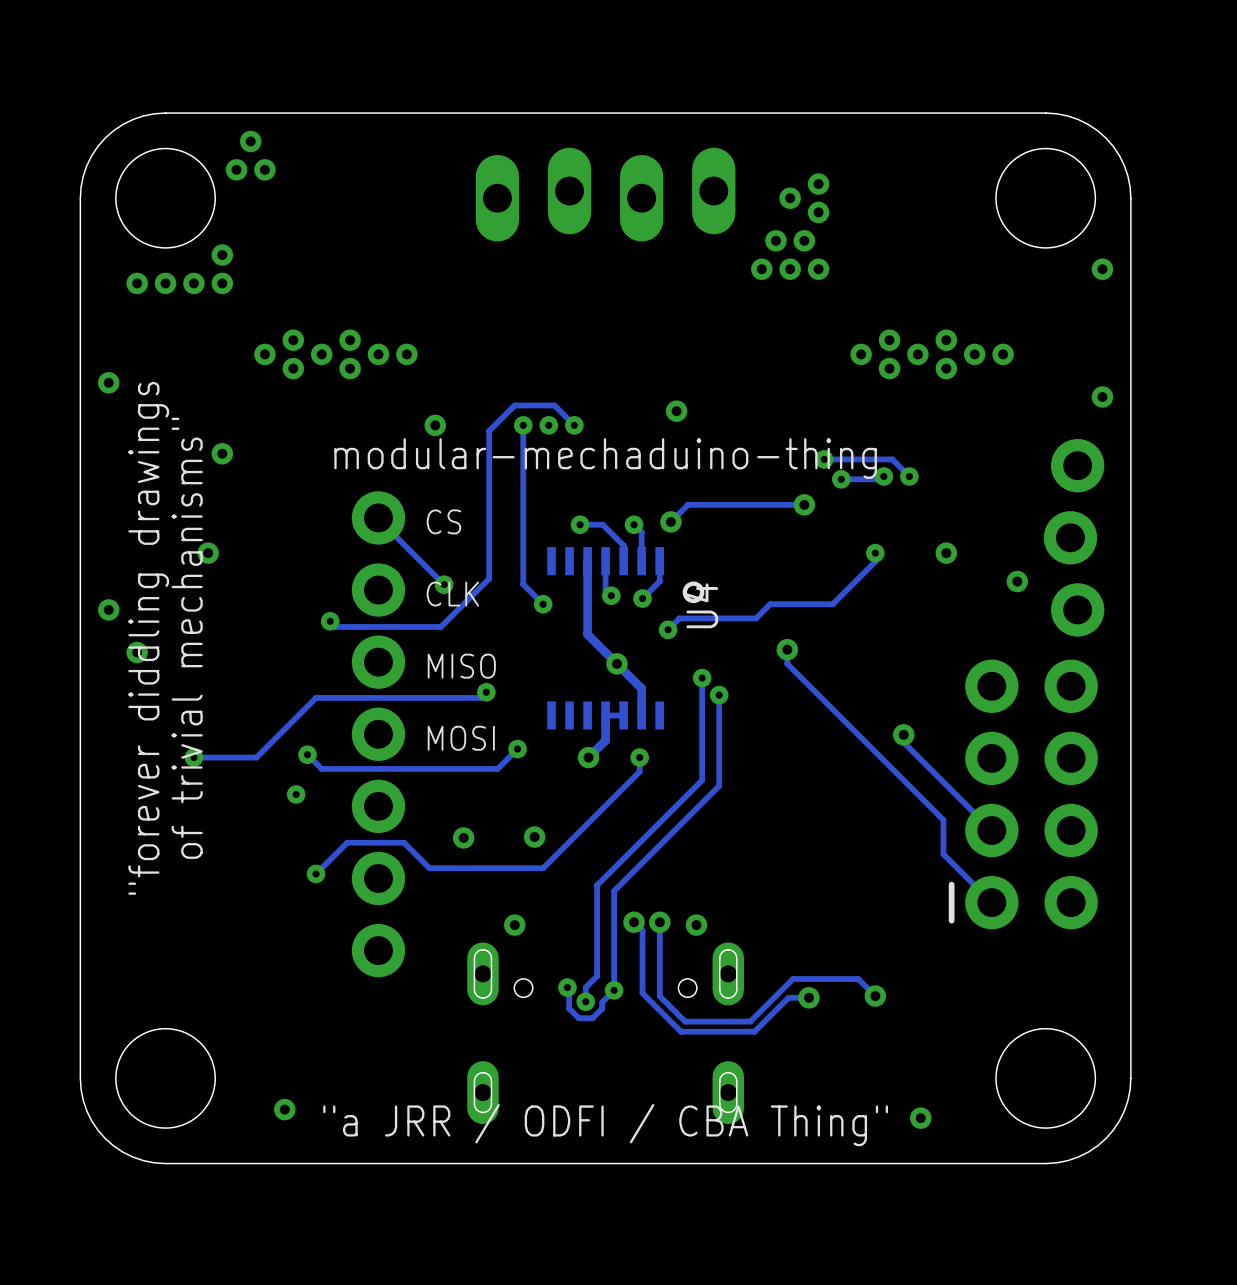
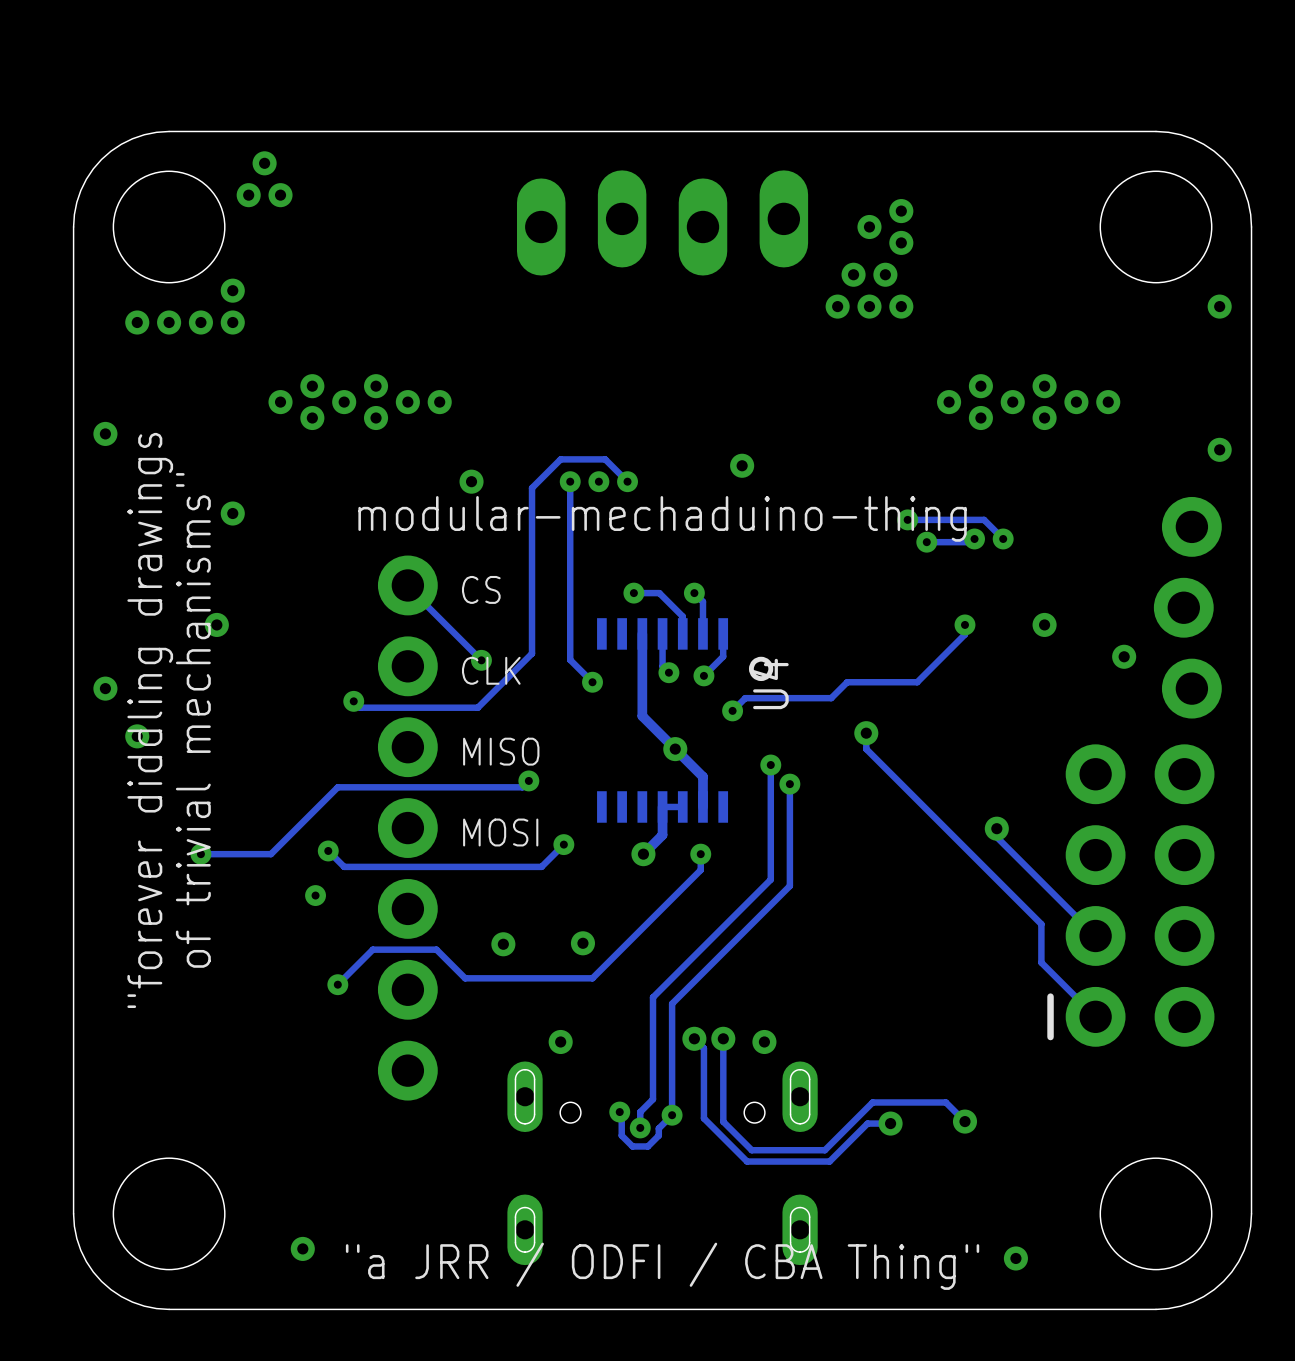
track: (804, 504) (687, 504) (670, 521) -> none
via: (804, 504) -> none
via: (670, 521) -> none

